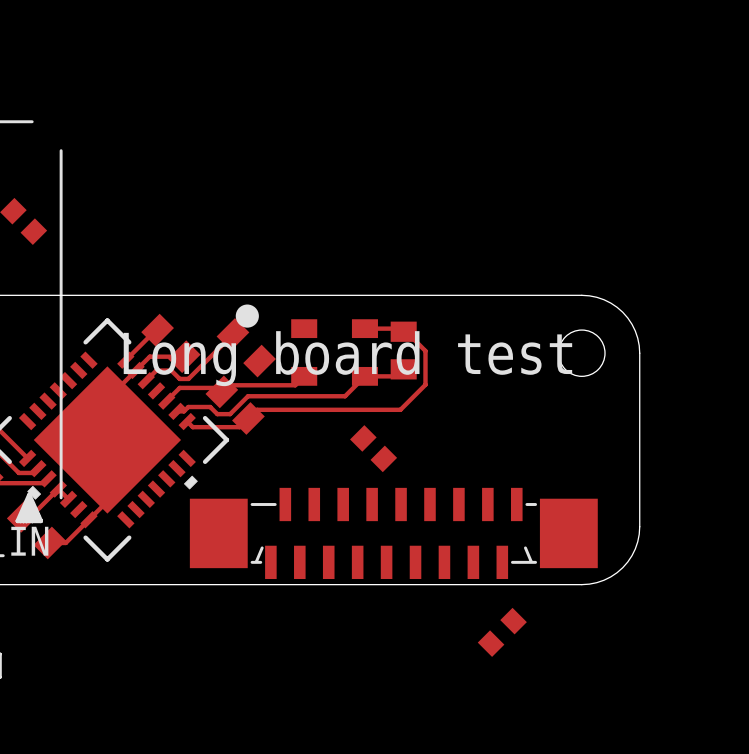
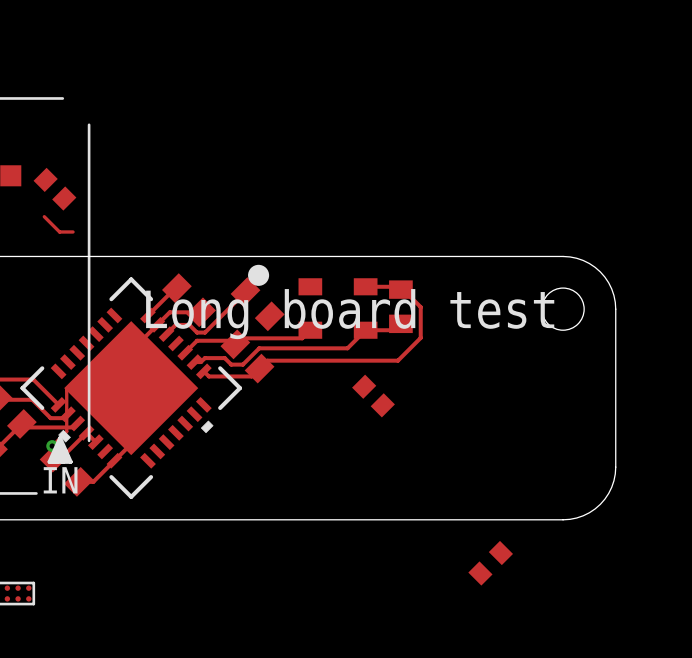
track: none -> (44, 216) (59, 231) (73, 231)
track: none -> (73, 383) (66, 389) (66, 431) (52, 446)
via: none -> (52, 446)
part: (393, 533) -> none

